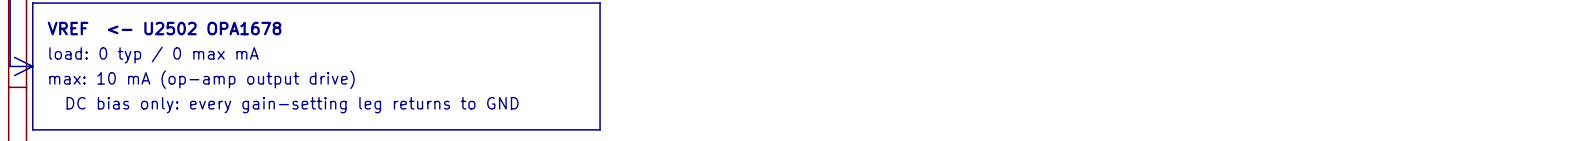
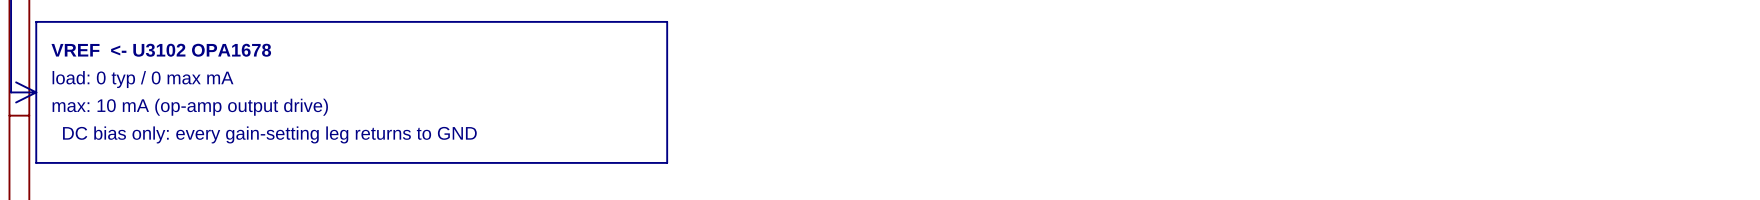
text: VREF <- U2502 OPA1678 (164, 28) -> VREF <- U3102 OPA1678 (161, 50)

